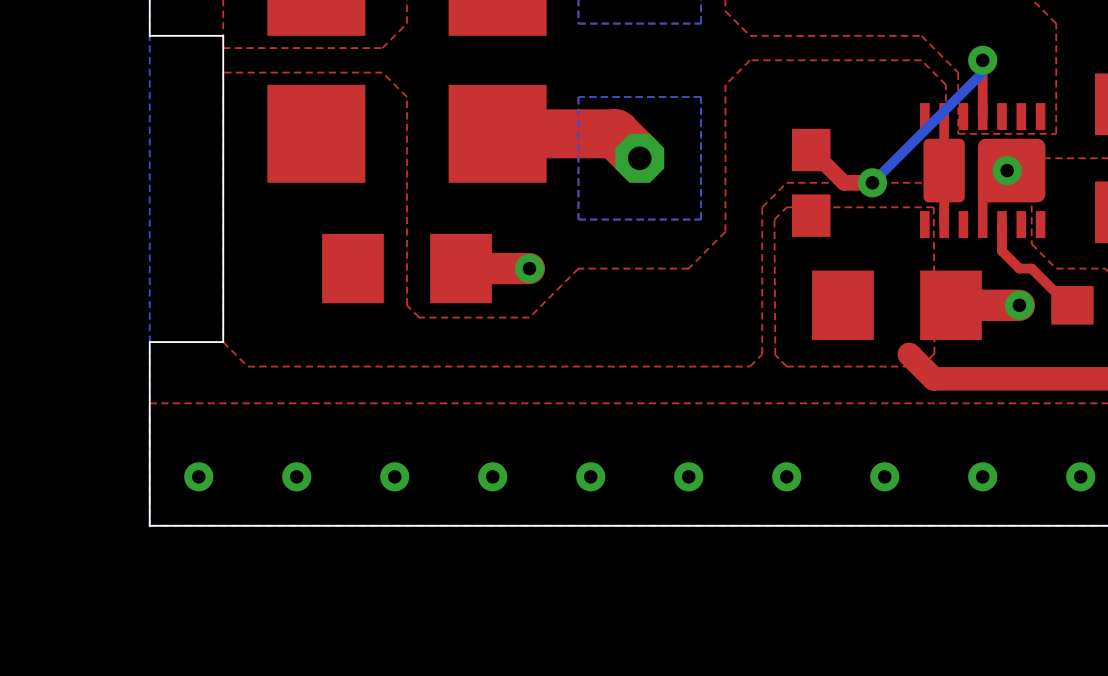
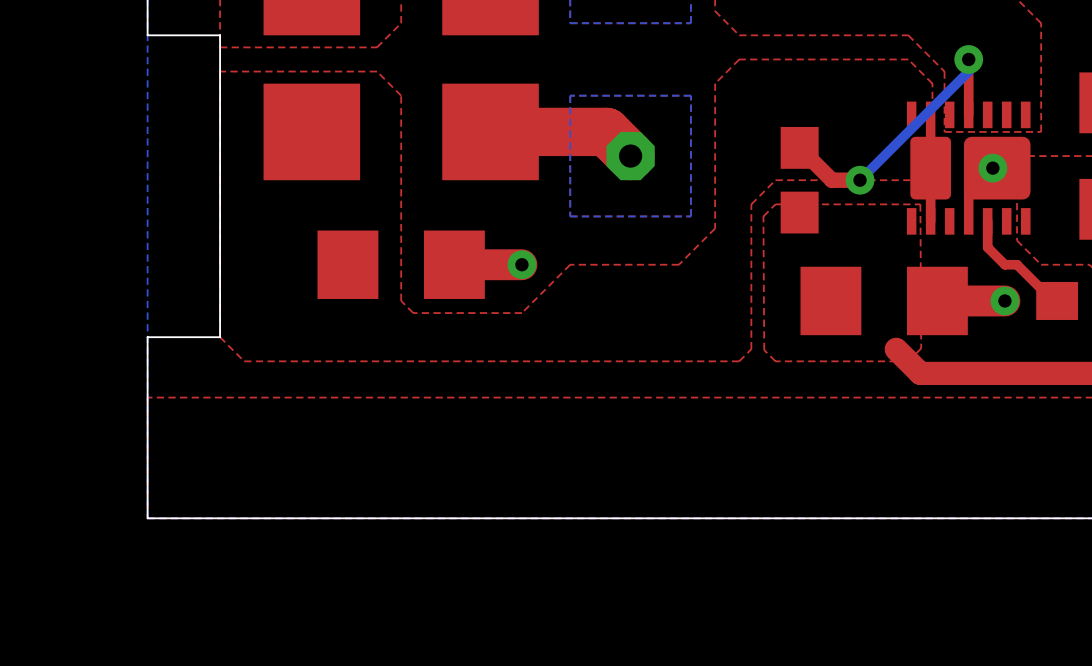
via: (198, 476) -> none
via: (296, 476) -> none
via: (394, 476) -> none
via: (492, 476) -> none
via: (590, 476) -> none
via: (688, 476) -> none
via: (786, 476) -> none
via: (884, 476) -> none
via: (982, 476) -> none
via: (1080, 476) -> none

